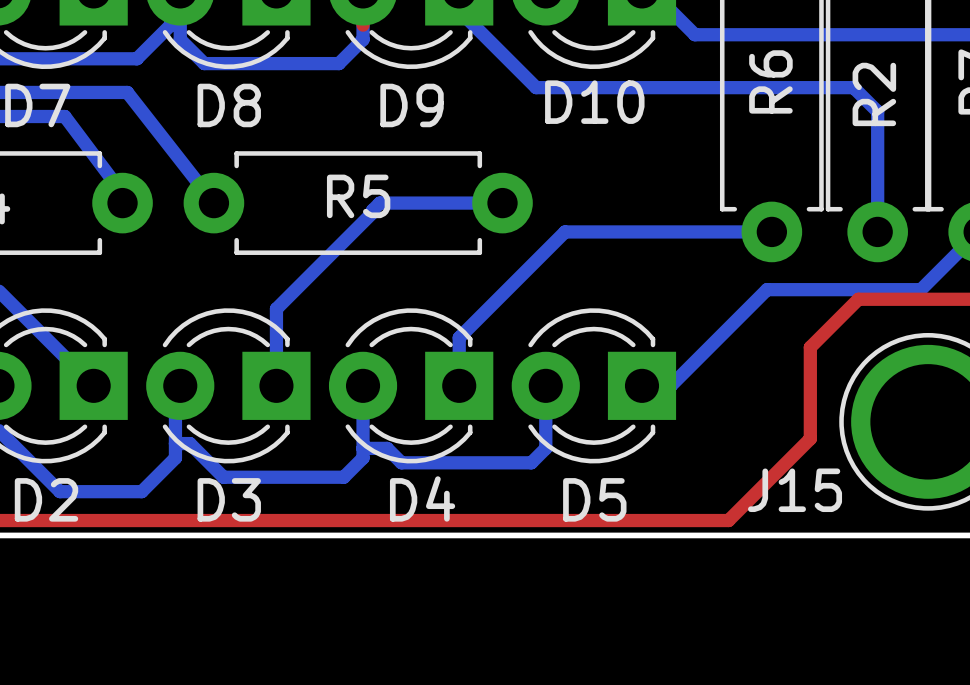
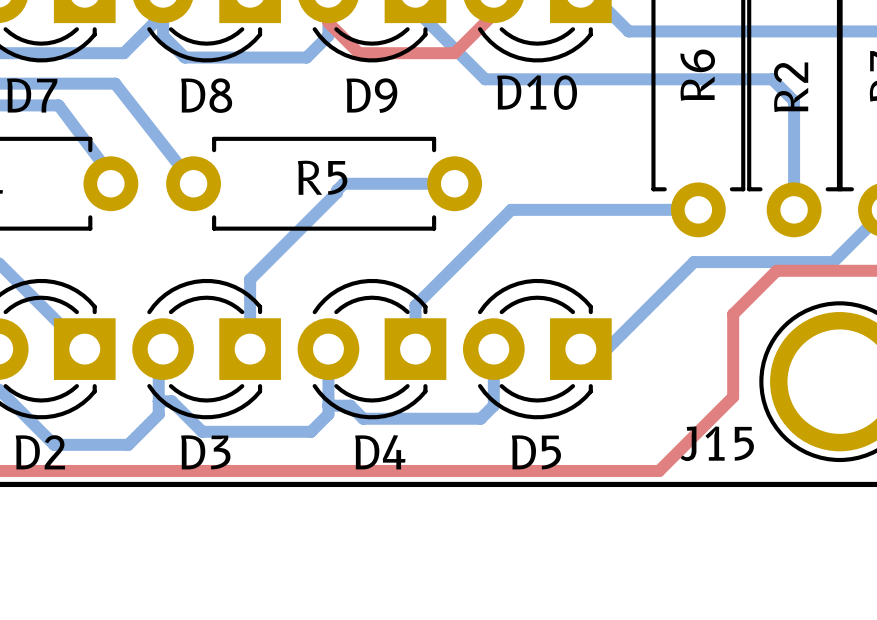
top track: none -> (493, 14) (454, 53) (358, 53) (328, 22)

